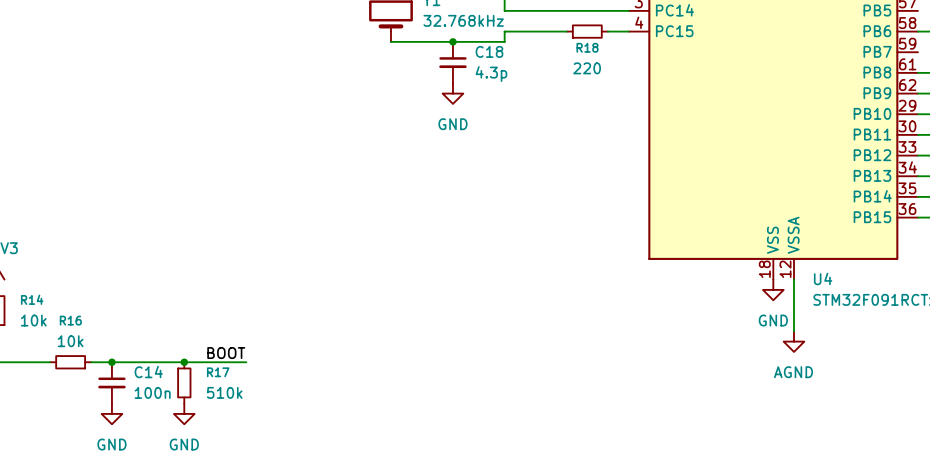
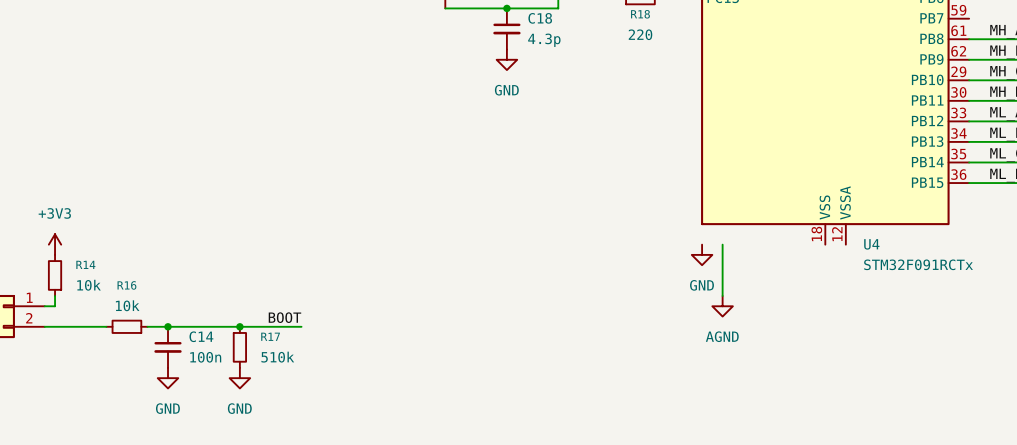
wire: (794, 279) (794, 331) -> (722, 244) (722, 296)
power symbol position: GND (773, 289) -> GND (702, 254)
power symbol position: AGND (794, 341) -> AGND (722, 306)

